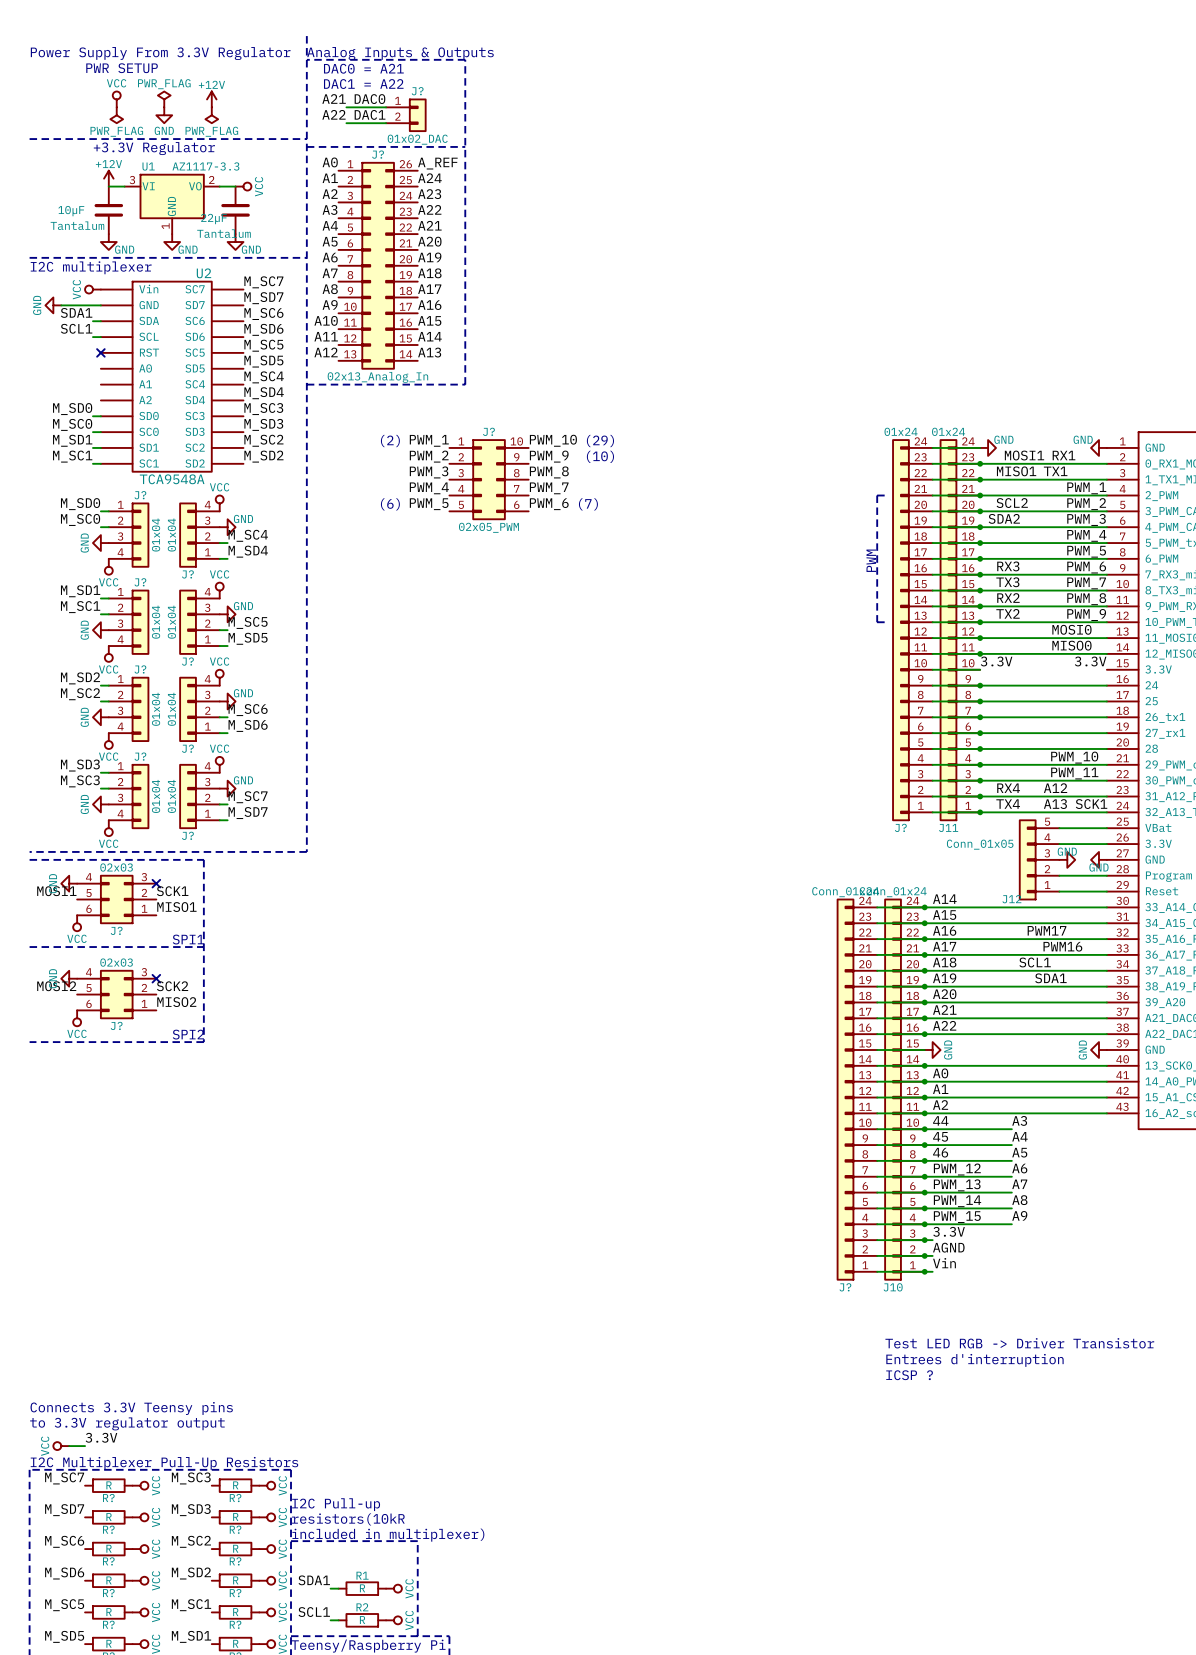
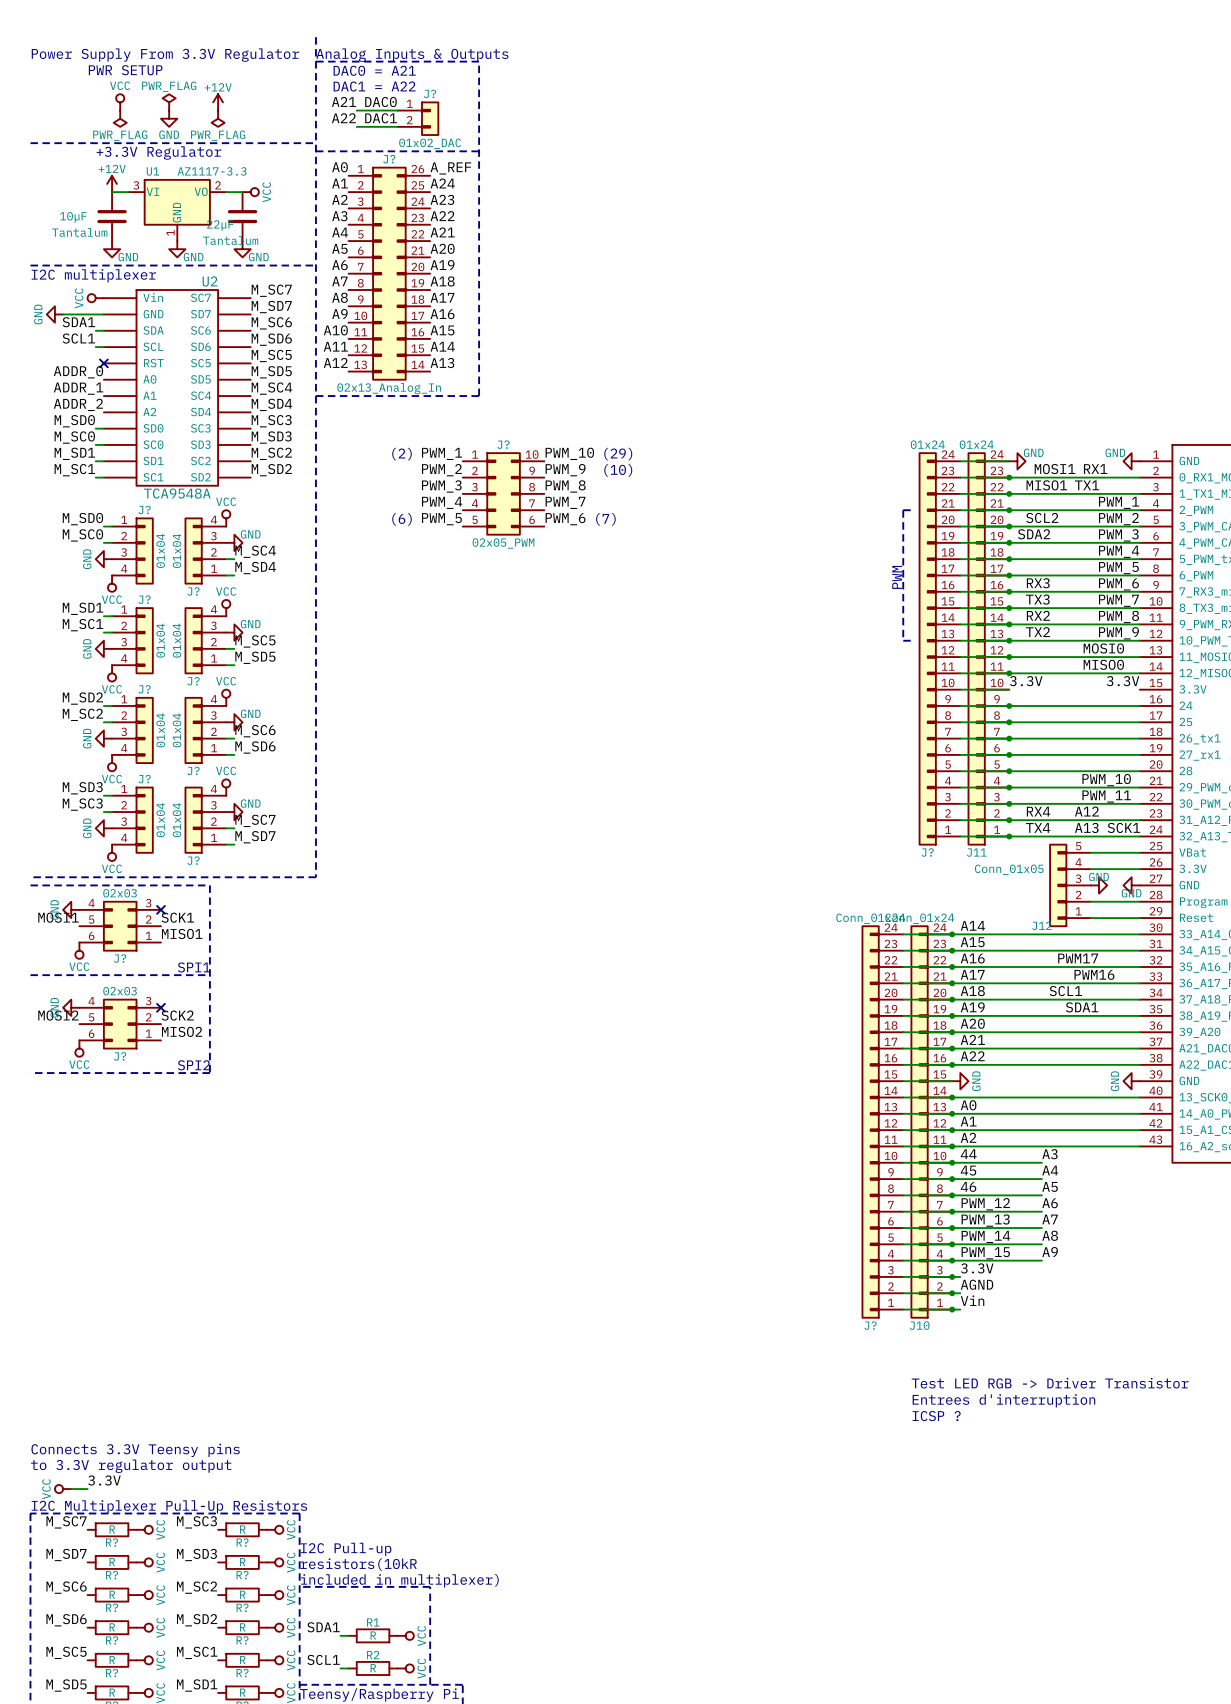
label: none -> ADDR_0 (78, 372)
label: none -> ADDR_1 (78, 388)
label: none -> ADDR_2 (78, 404)

